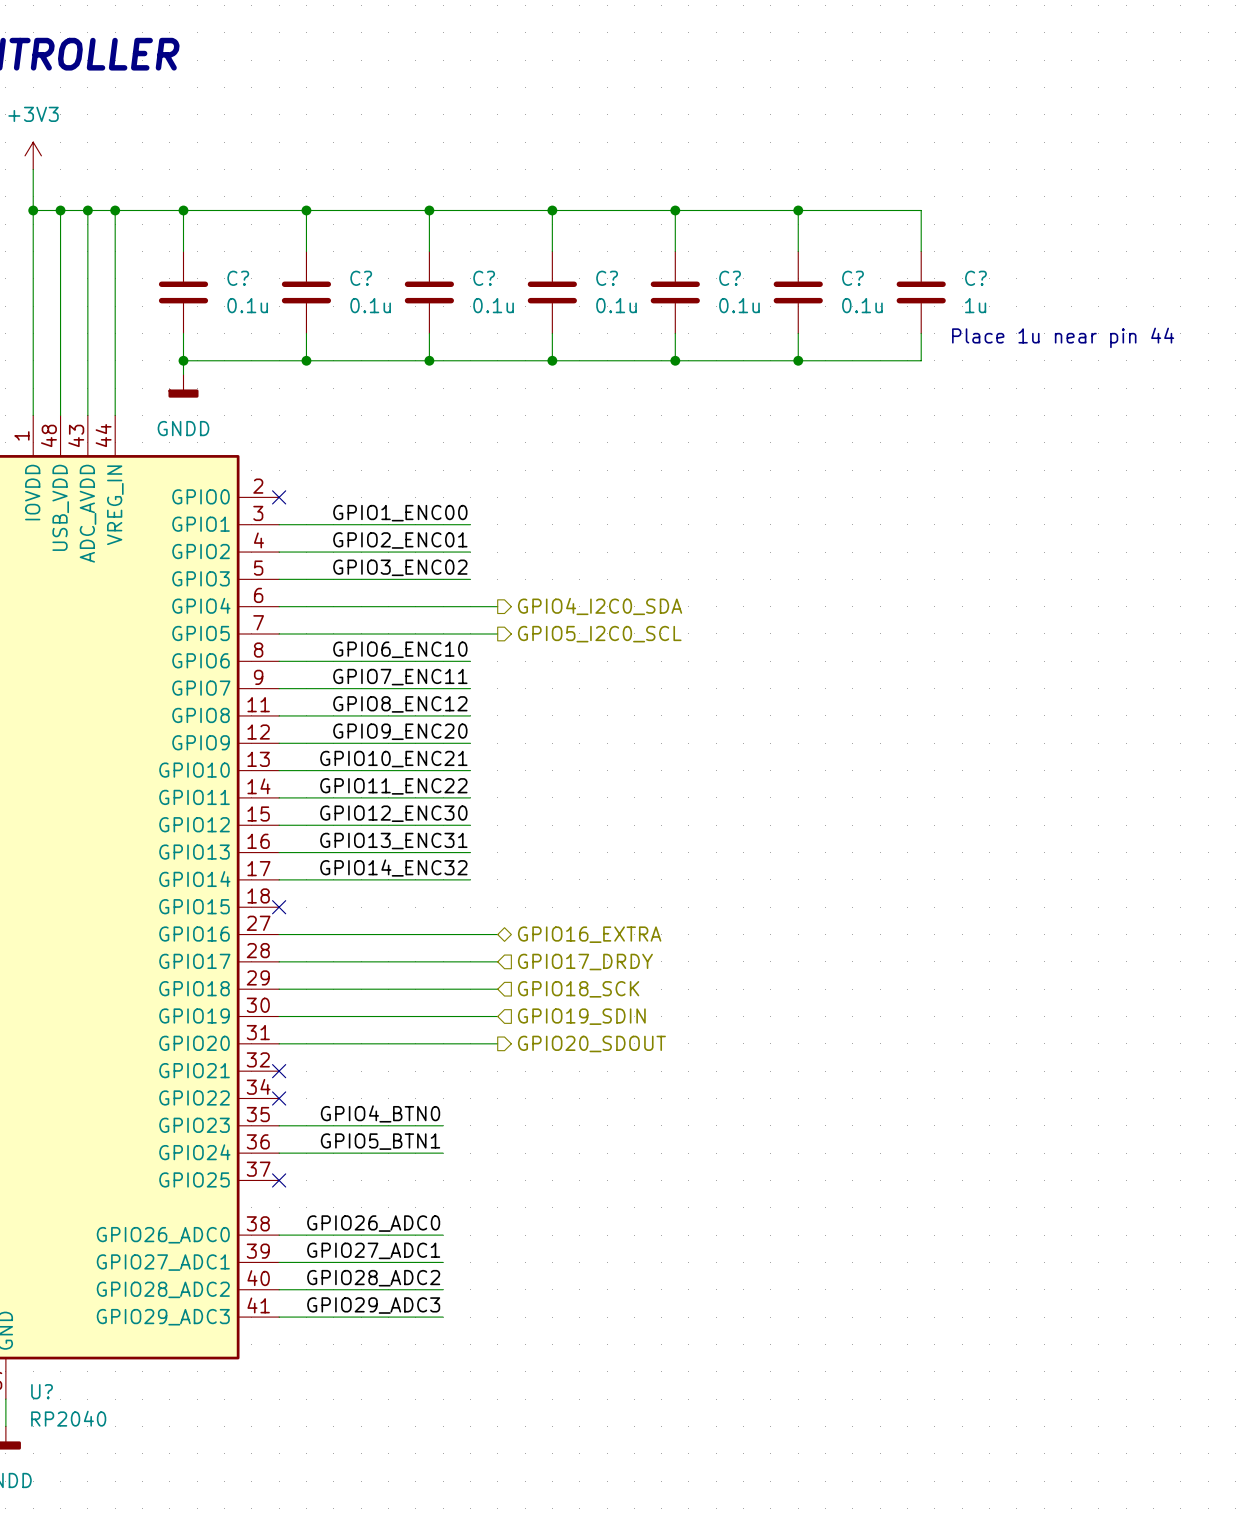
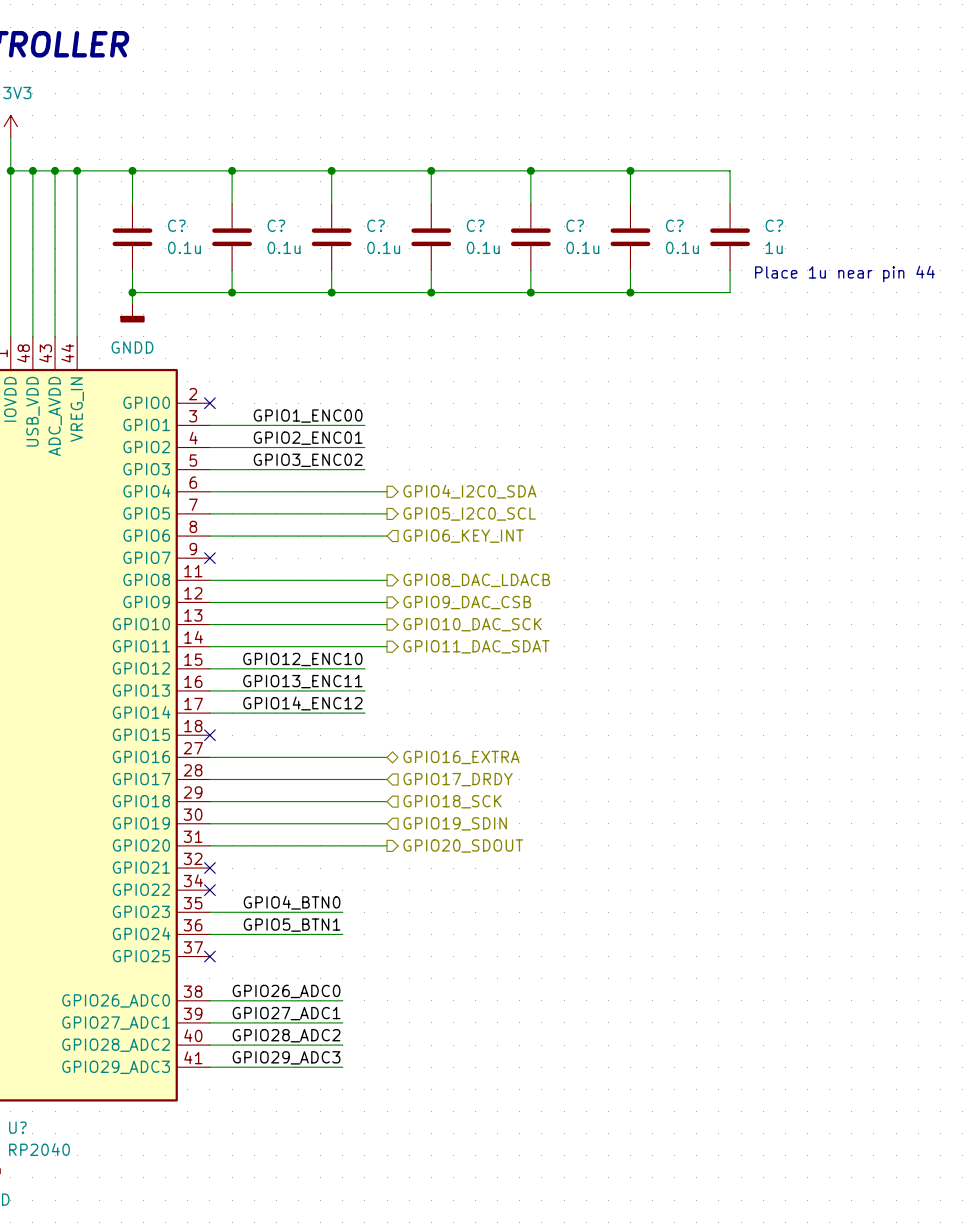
label: GPIO6_ENC10 (400, 649) -> none
wire: none -> (364, 536) (387, 536)
hierarchical label: none -> GPIO6_KEY_INT (463, 536)
label: GPIO7_ENC11 (400, 677) -> none
wire: (279, 688) (470, 688) -> none
no-connect mark: none -> (209, 558)
label: GPIO8_ENC12 (400, 704) -> none
wire: none -> (364, 580) (387, 580)
hierarchical label: none -> GPIO8_DAC_LDACB (476, 580)
label: GPIO9_ENC20 (400, 731) -> none
wire: none -> (364, 602) (387, 602)
hierarchical label: none -> GPIO9_DAC_CSB (467, 602)
label: GPIO10_ENC21 (393, 759) -> none
wire: none -> (364, 624) (387, 624)
hierarchical label: none -> GPIO10_DAC_SCK (472, 624)
label: GPIO11_ENC22 (393, 786) -> none
wire: none -> (364, 646) (387, 646)
hierarchical label: none -> GPIO11_DAC_SDAT (476, 646)
label: GPIO12_ENC30 (393, 813) -> GPIO12_ENC10 (302, 659)
label: GPIO13_ENC31 (393, 841) -> GPIO13_ENC11 (302, 681)
label: GPIO14_ENC32 (393, 868) -> GPIO14_ENC12 (302, 703)

